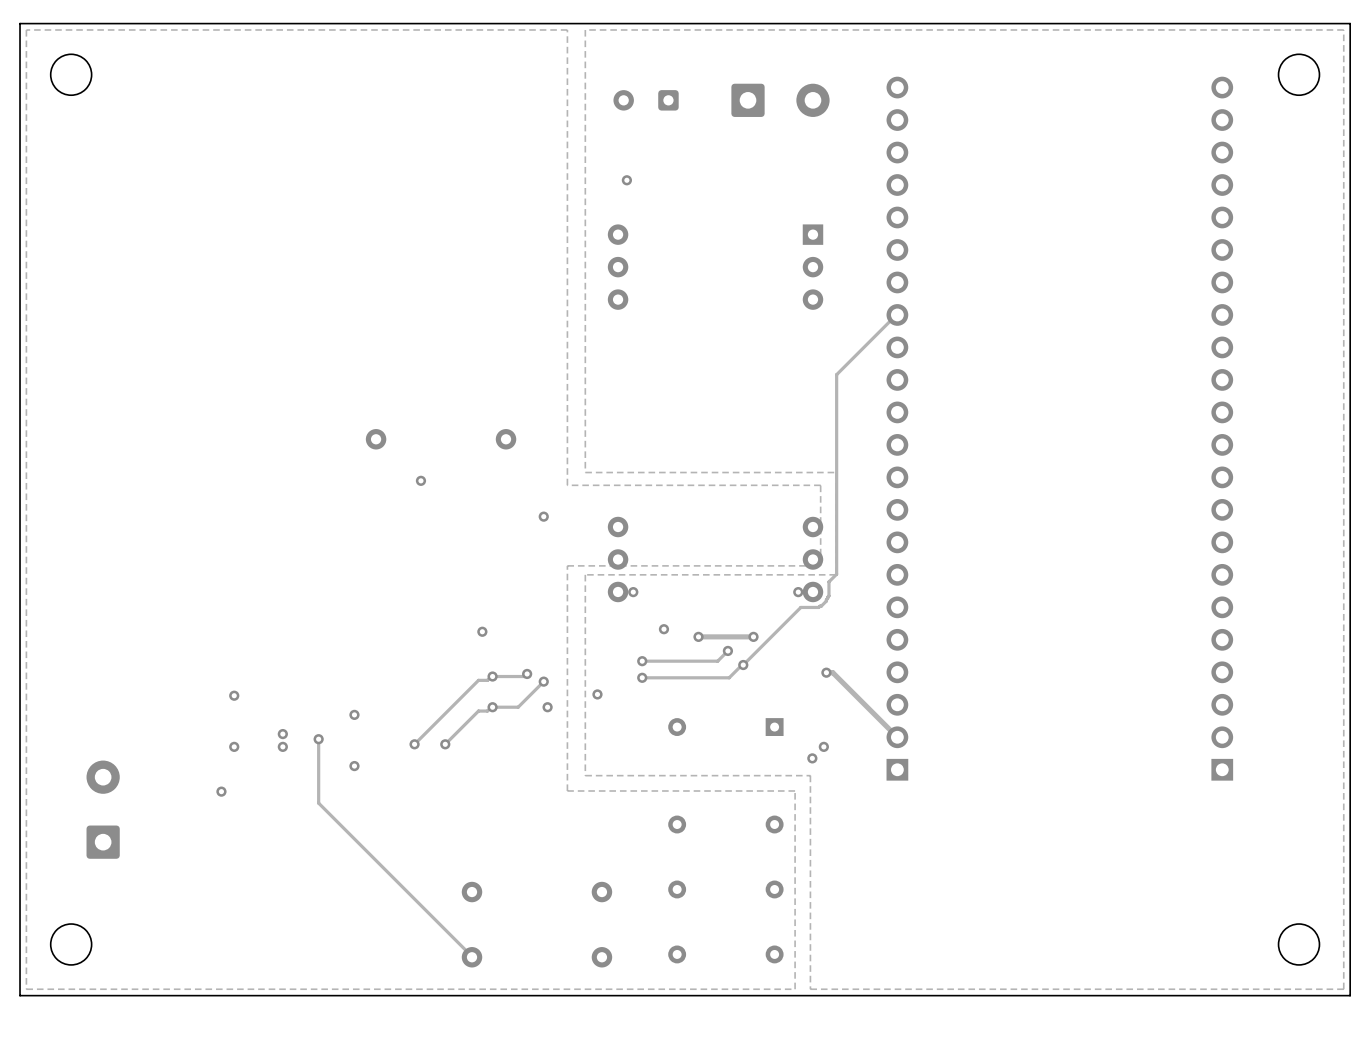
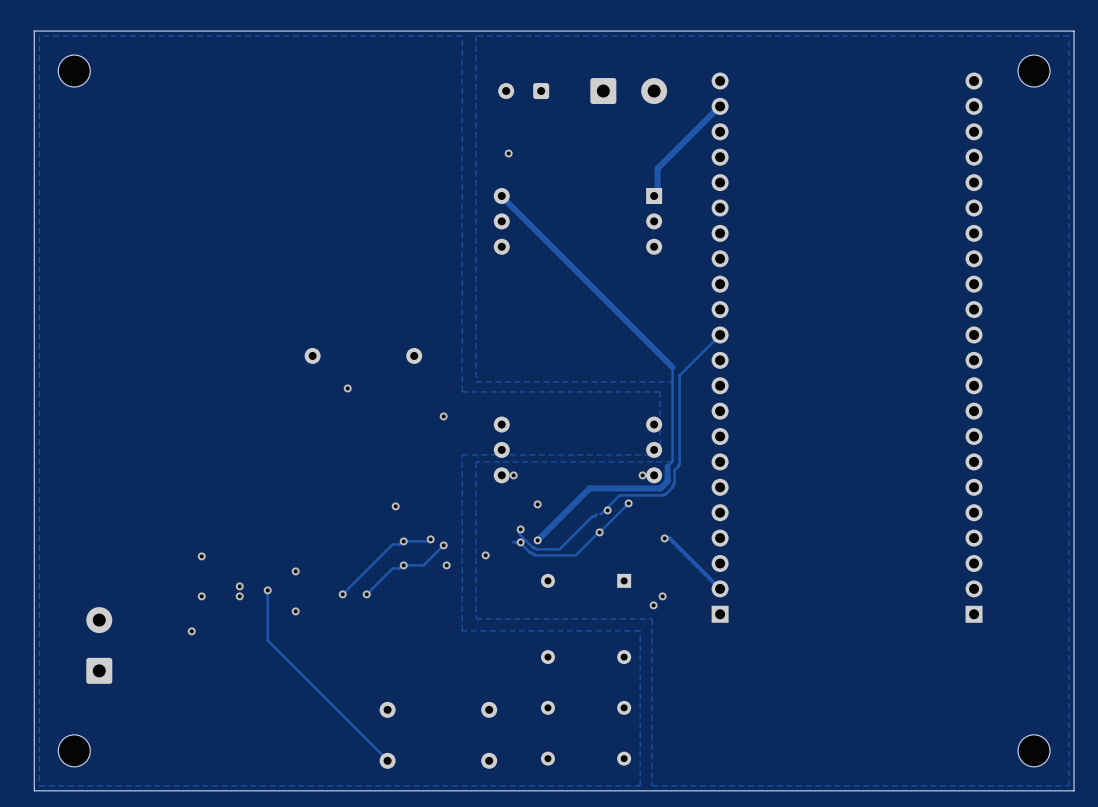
track: none -> (714, 111) (657, 168) (657, 191) (654, 195)
track: (890, 320) (836, 374) (836, 453) -> (506, 201) (672, 367)
track: none -> (714, 340) (679, 375) (679, 464) (674, 470) (674, 483) (672, 487) (663, 495) (619, 495) (600, 514)
track: (830, 580) (828, 595) (821, 606) (800, 607) (780, 627) -> (667, 466) (667, 480) (660, 488) (589, 488) (537, 540)
via: none -> (628, 503)
via: (698, 636) -> none
track: (753, 636) (698, 636) -> none
track: none -> (596, 514) (587, 521)
via: (727, 650) -> none
track: (717, 661) (642, 661) -> (579, 529) (559, 549) (536, 549) (518, 533)
via: none -> (537, 540)
track: (729, 677) (642, 677) -> (588, 542) (575, 555) (535, 555) (519, 542) (512, 542)

